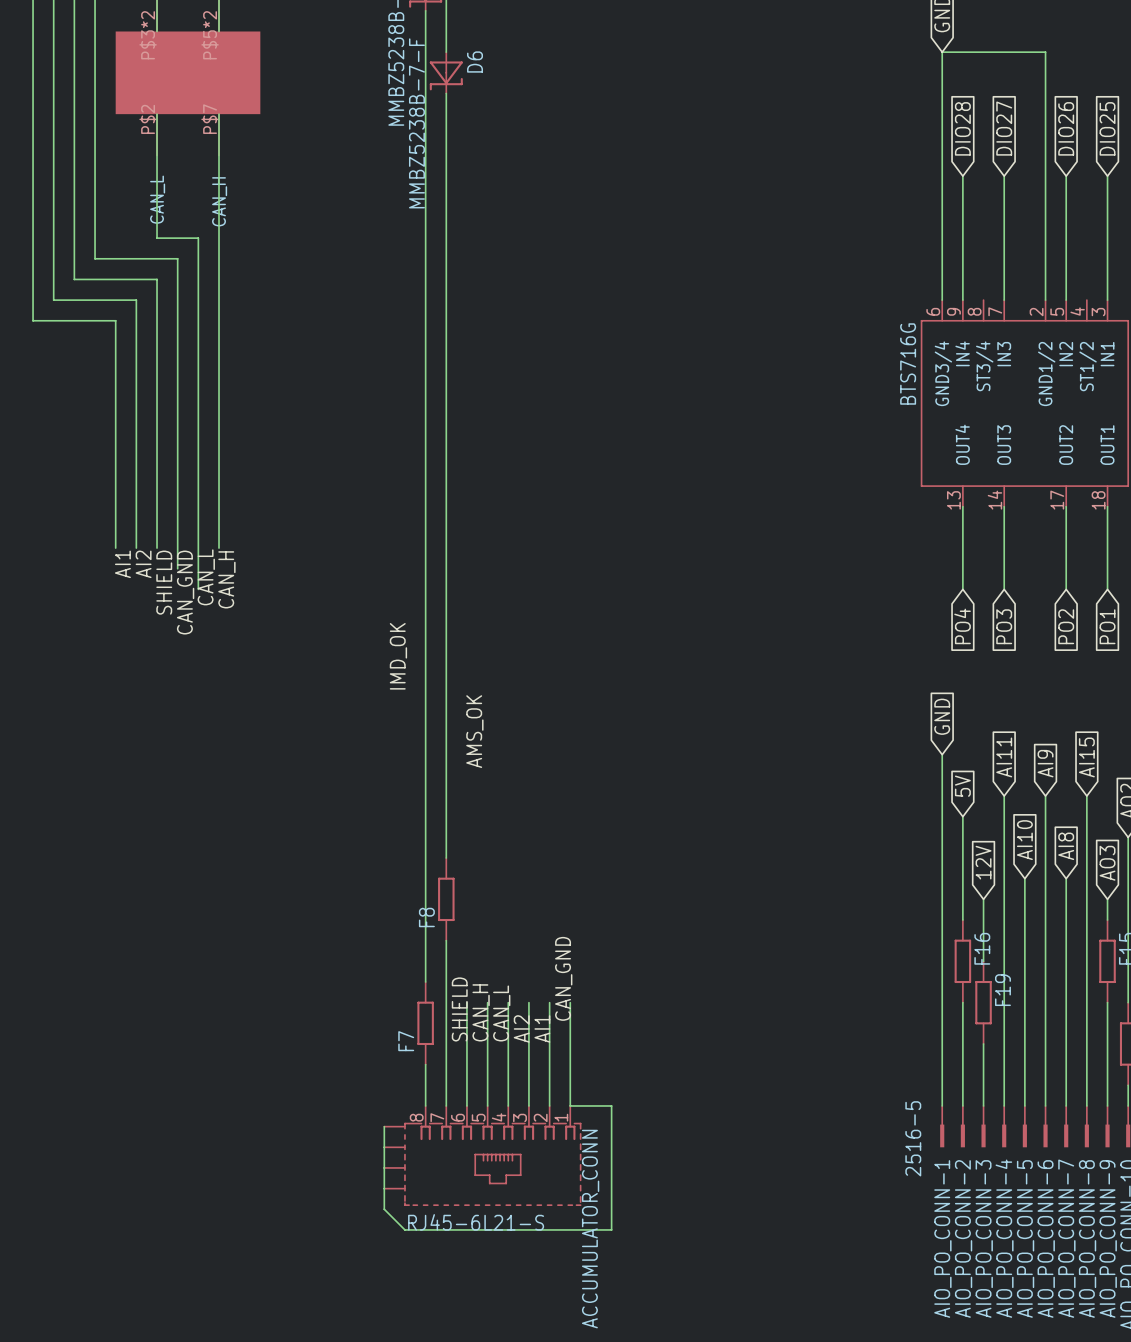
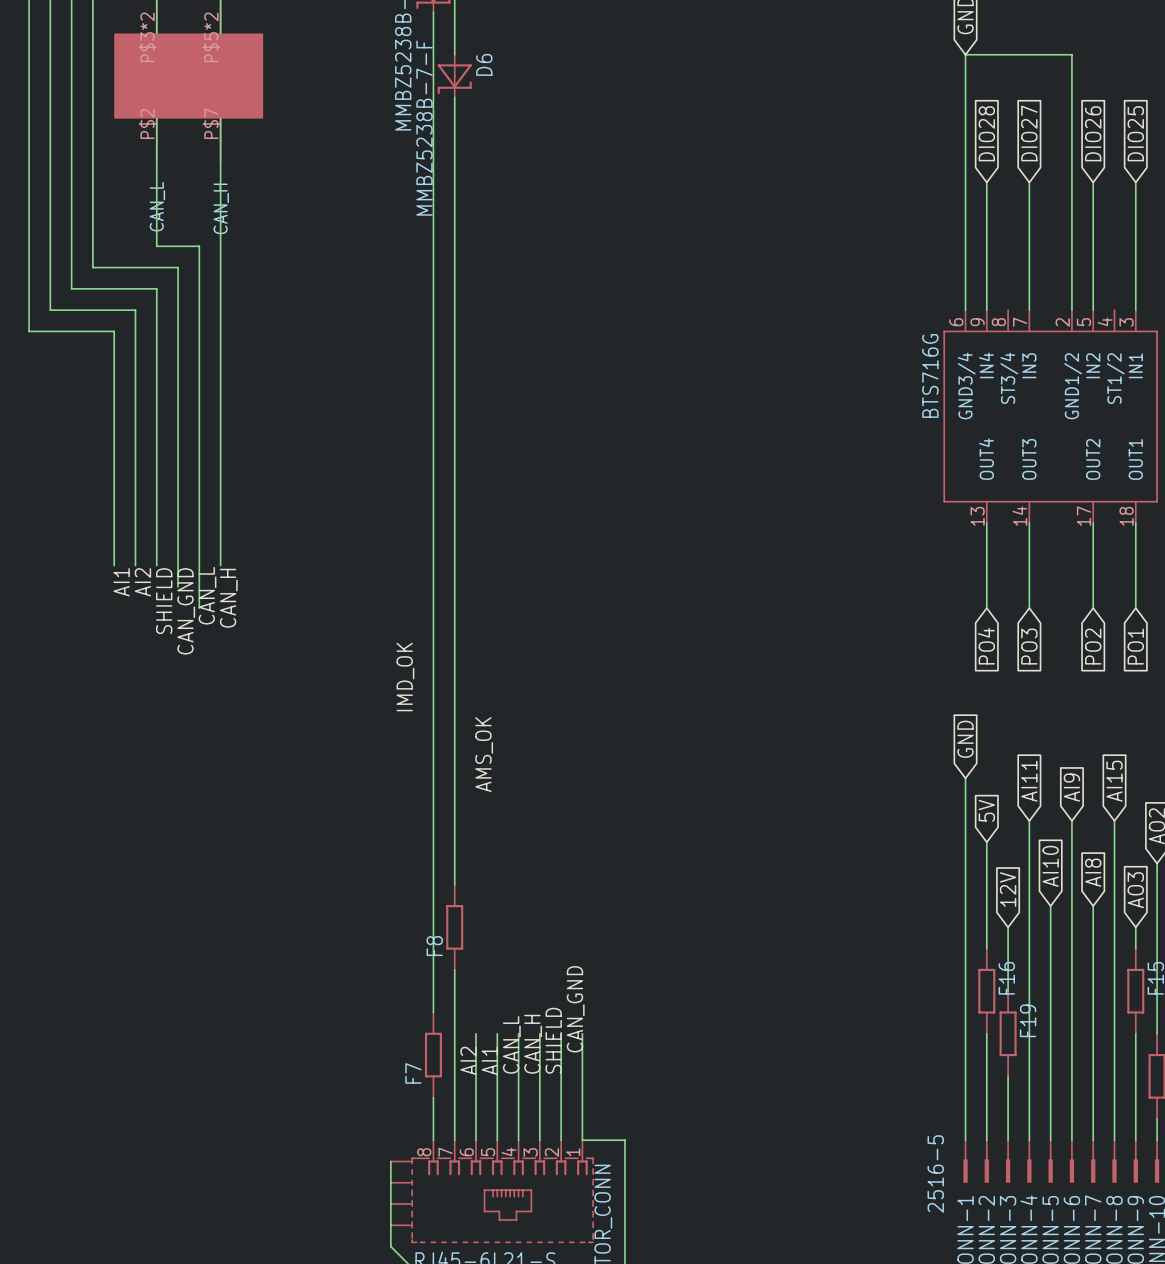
label: SHIELD (459, 1009) -> AI2 (468, 1060)
label: CAN_H (481, 1012) -> AI1 (489, 1060)
label: AI2 (521, 1028) -> CAN_H (533, 1044)
label: AI1 (542, 1028) -> SHIELD (553, 1040)

